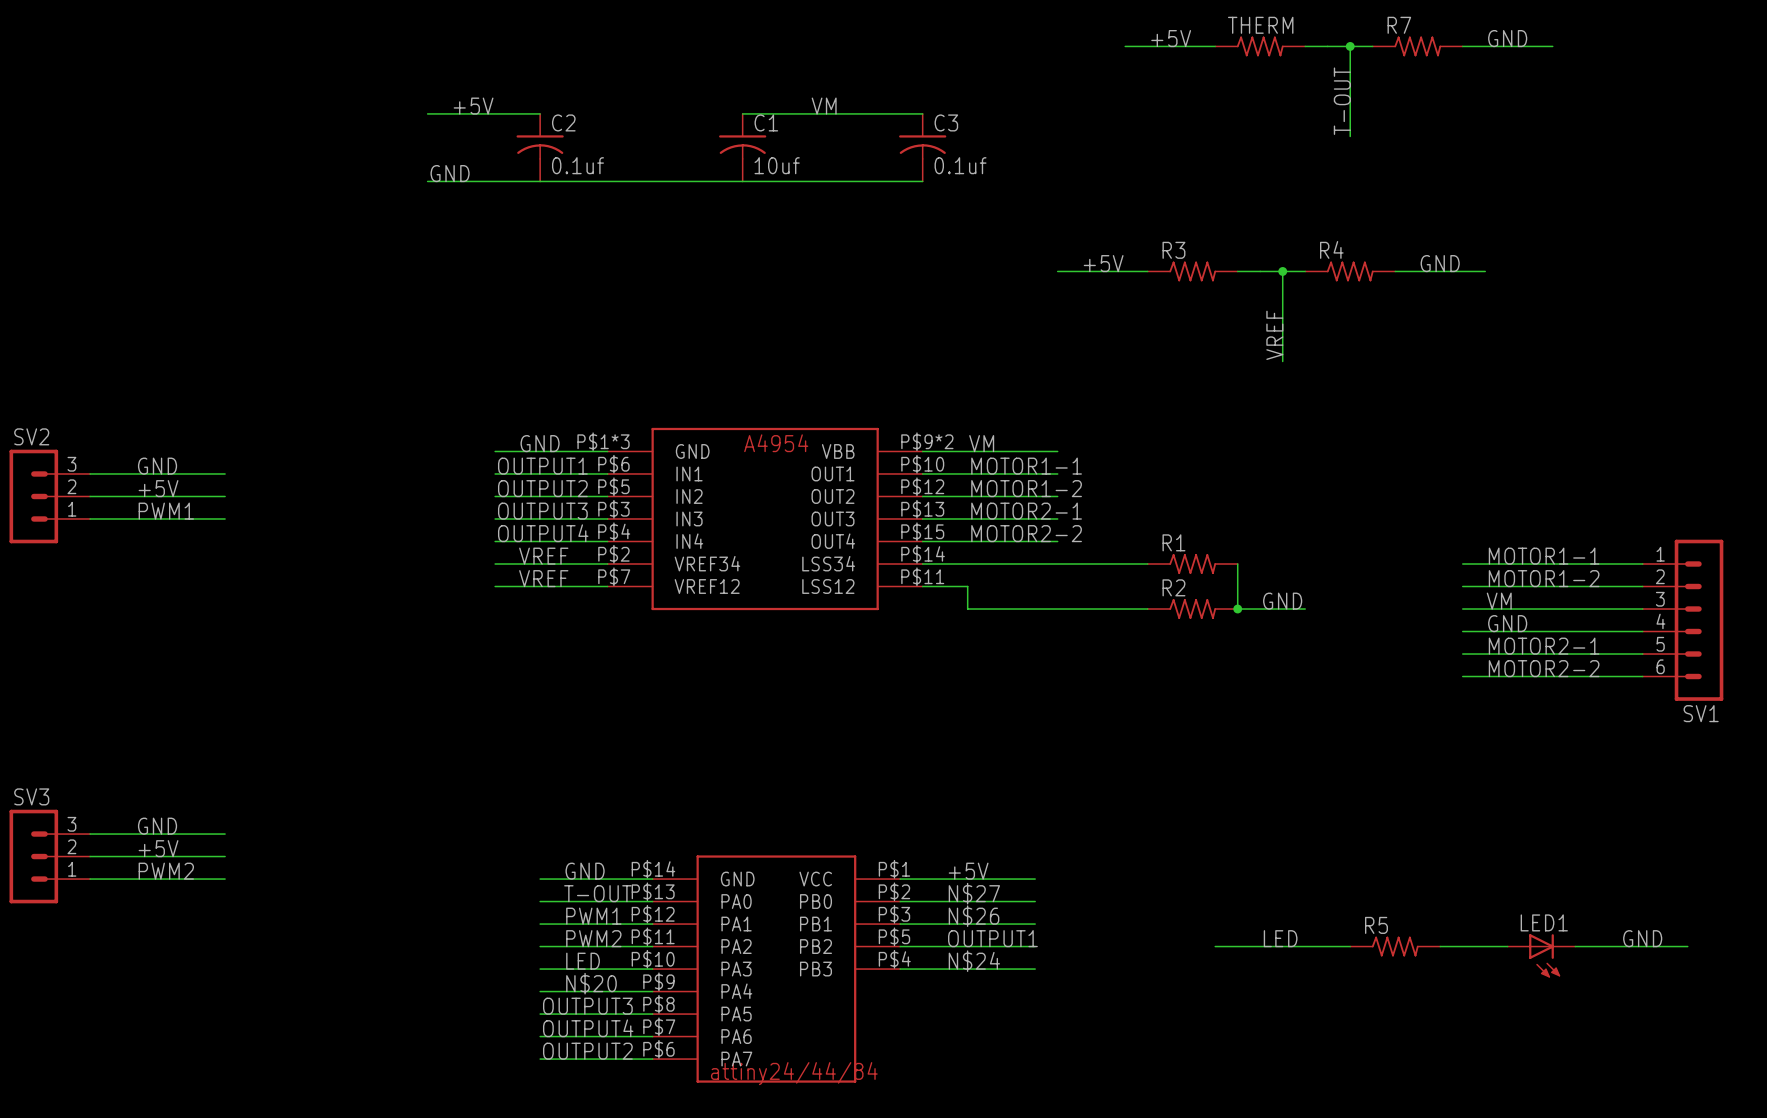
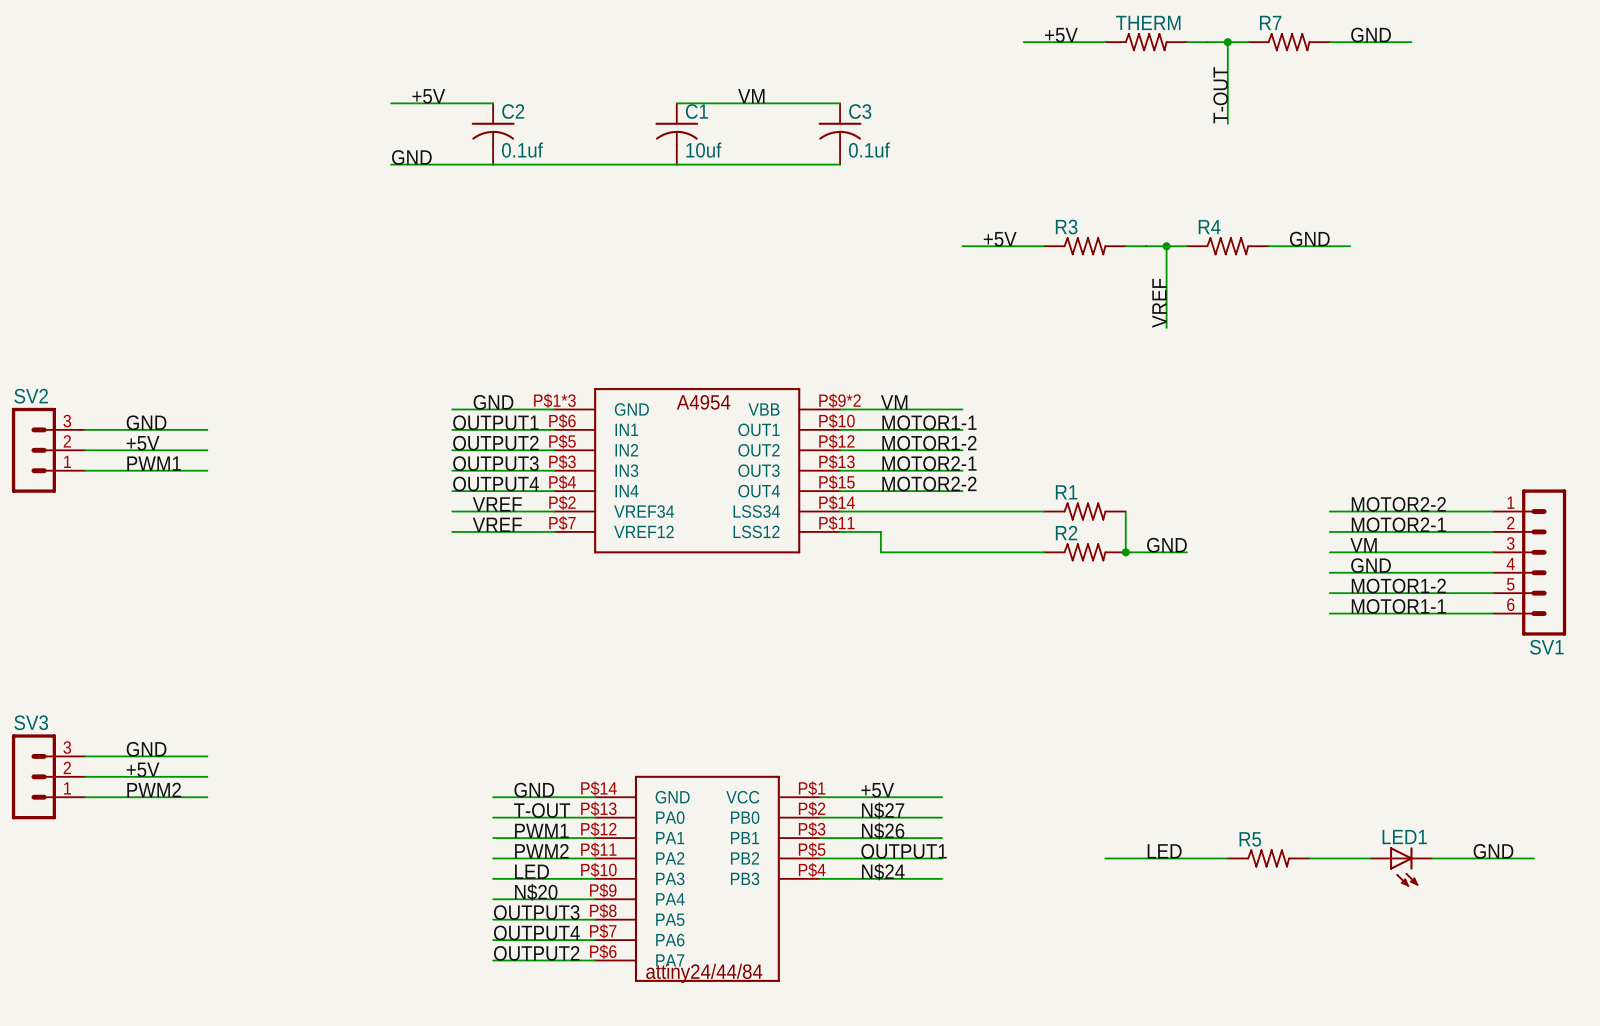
label: MOTOR1-1 (1544, 556) -> MOTOR2-2 (1398, 504)
label: MOTOR1-2 (1544, 578) -> MOTOR2-1 (1398, 524)
label: MOTOR2-1 (1544, 646) -> MOTOR1-2 (1398, 586)
label: MOTOR2-2 (1544, 668) -> MOTOR1-1 (1398, 606)

